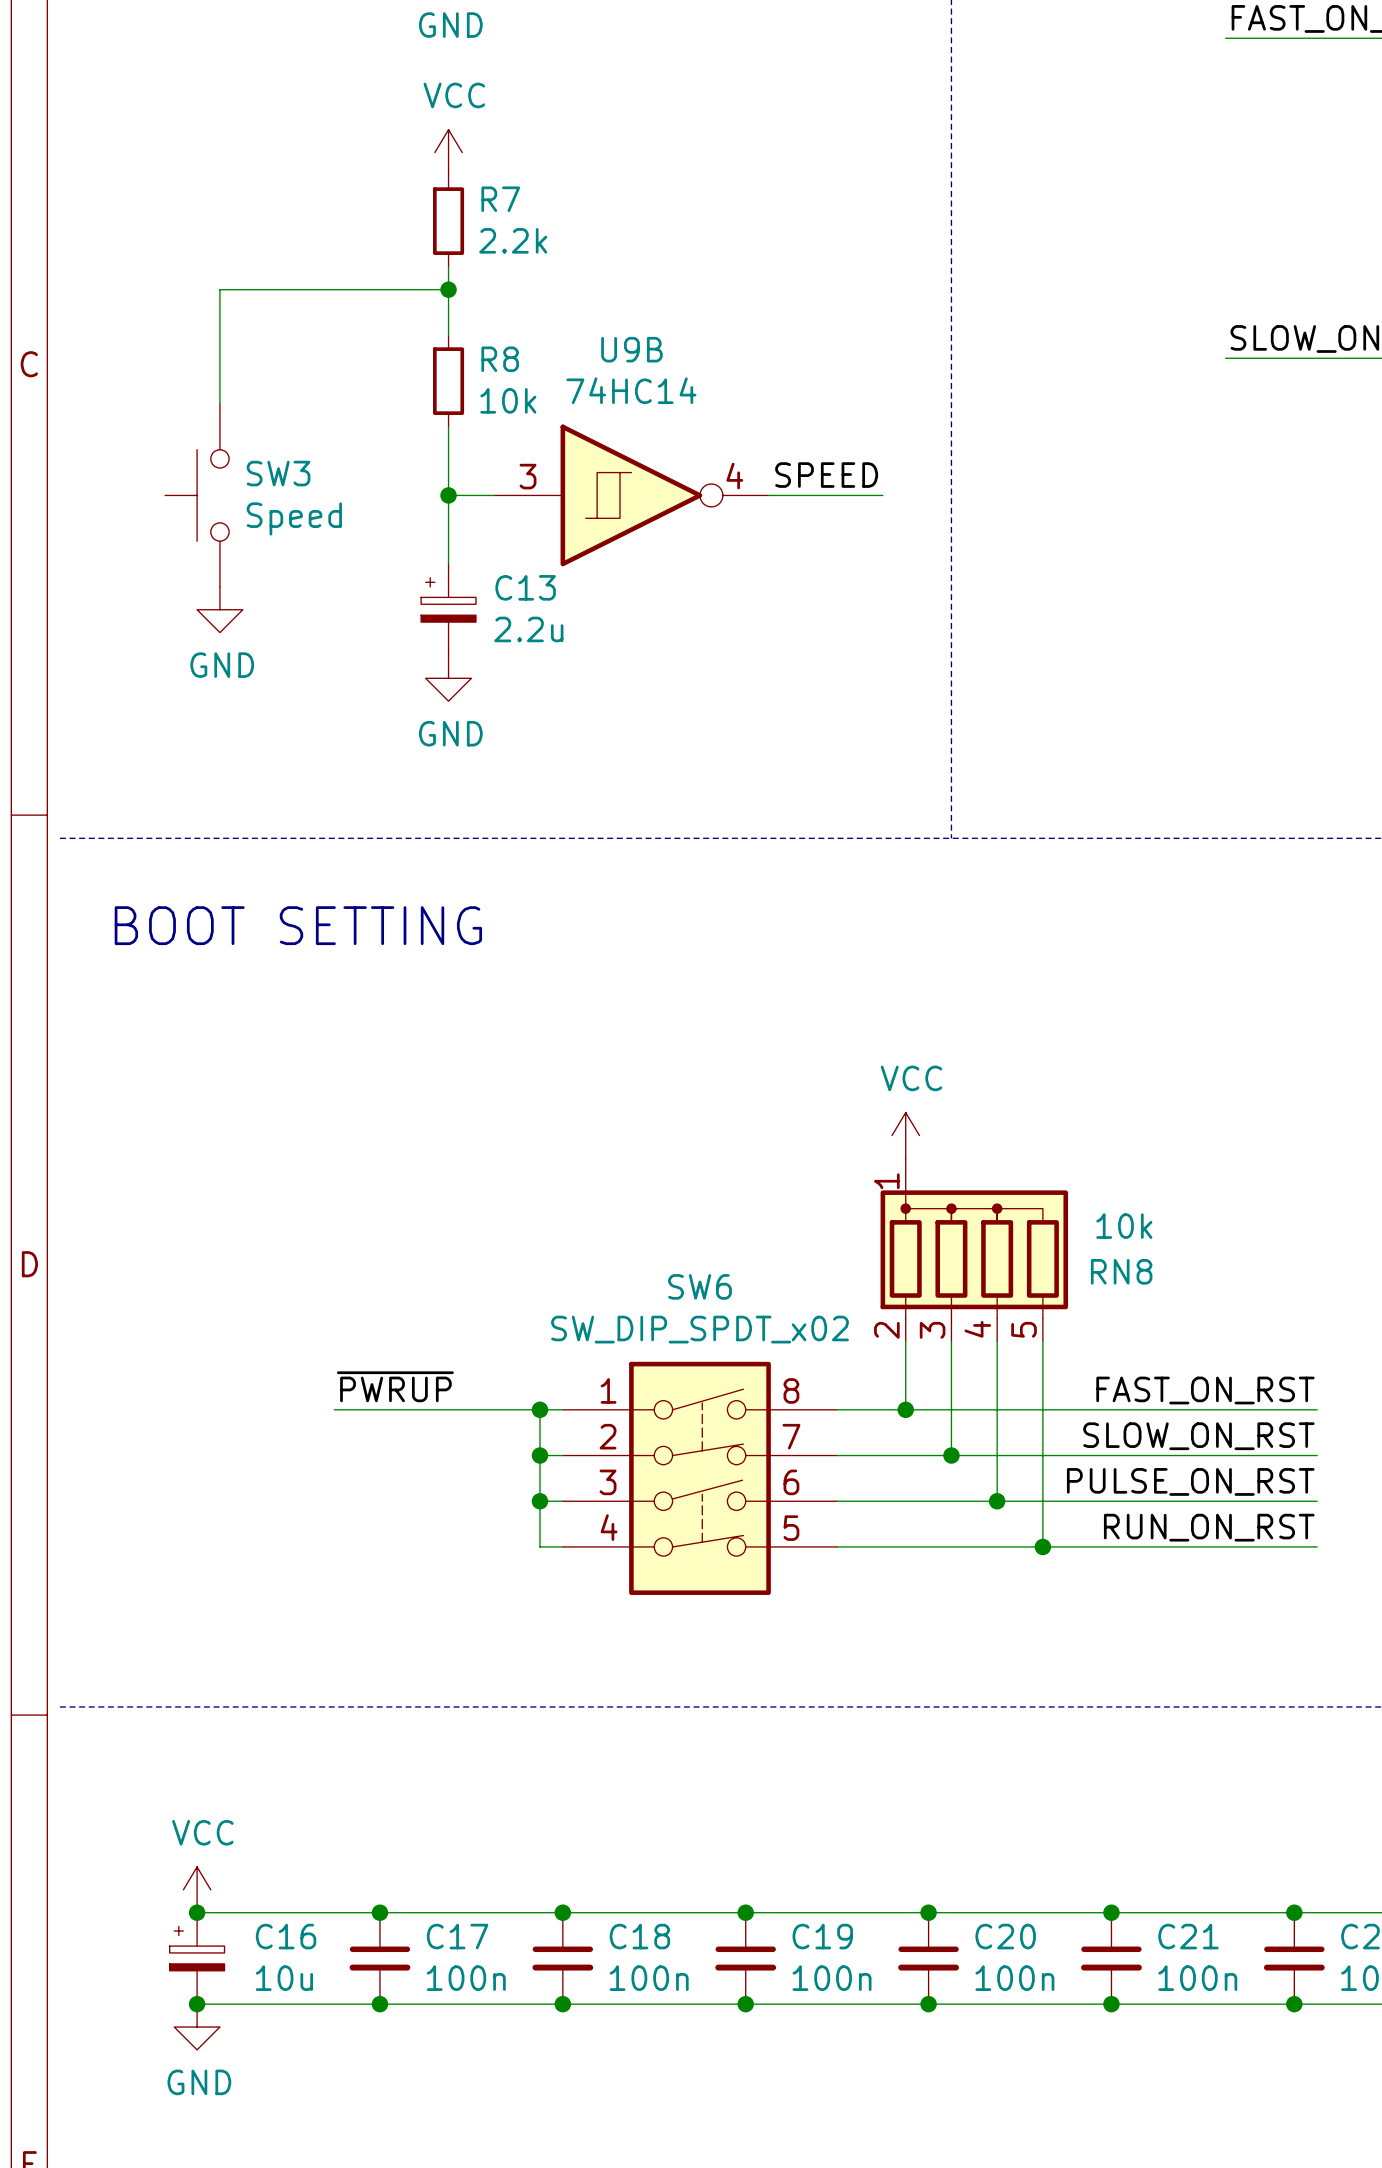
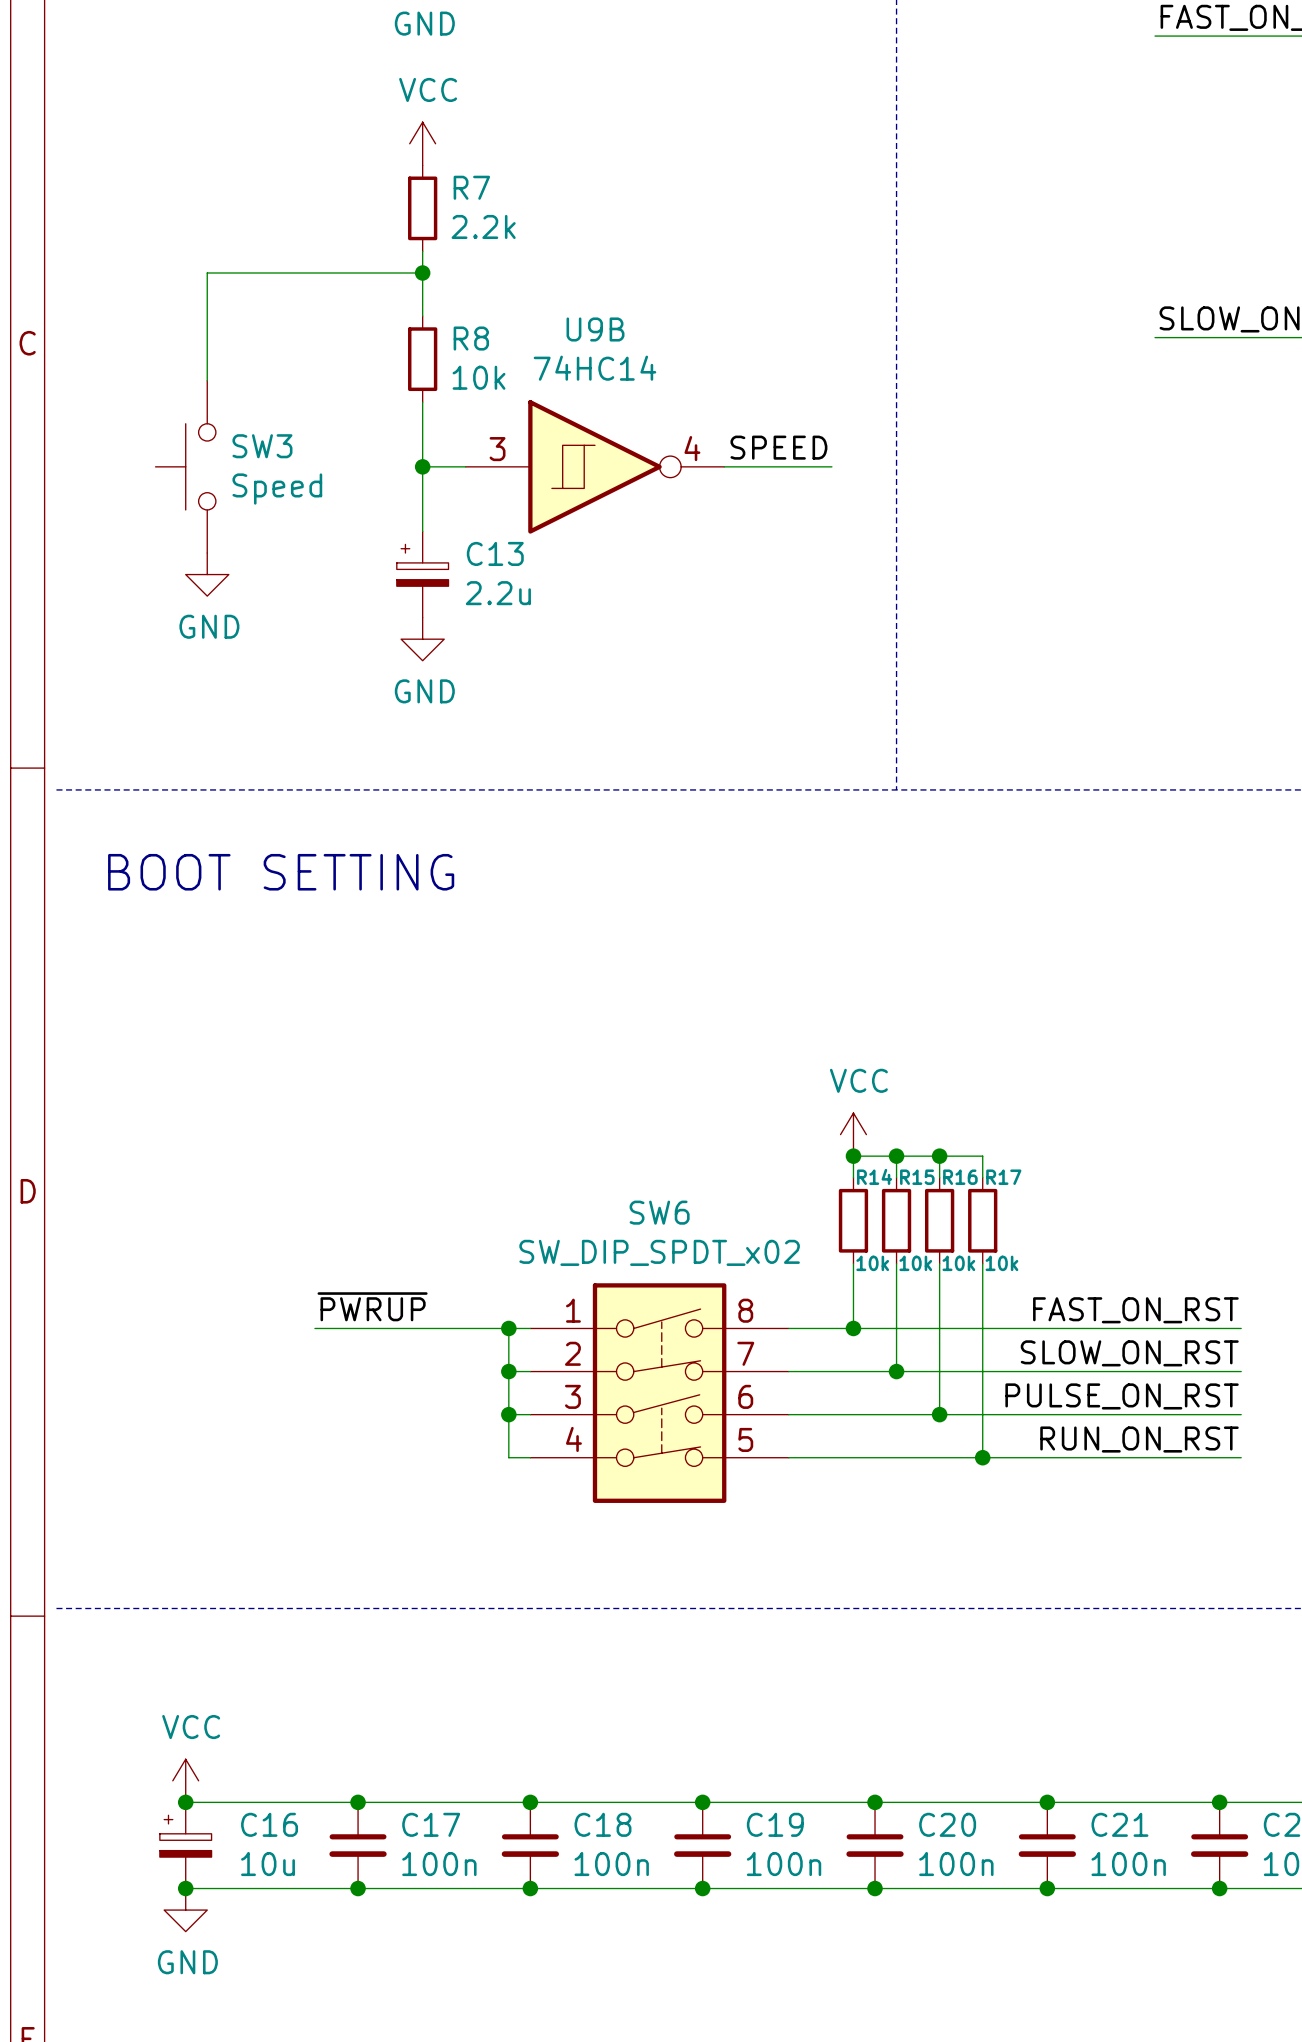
power symbol position: VCC (905, 1135) -> VCC (853, 1134)
junction: none -> (853, 1156)
junction: none -> (896, 1156)
junction: none -> (939, 1156)
RN8: 10k (974, 1249) -> none
R14: none -> 10k (853, 1220)
R15: none -> 10k (896, 1220)
R16: none -> 10k (939, 1220)
R17: none -> 10k (982, 1220)

